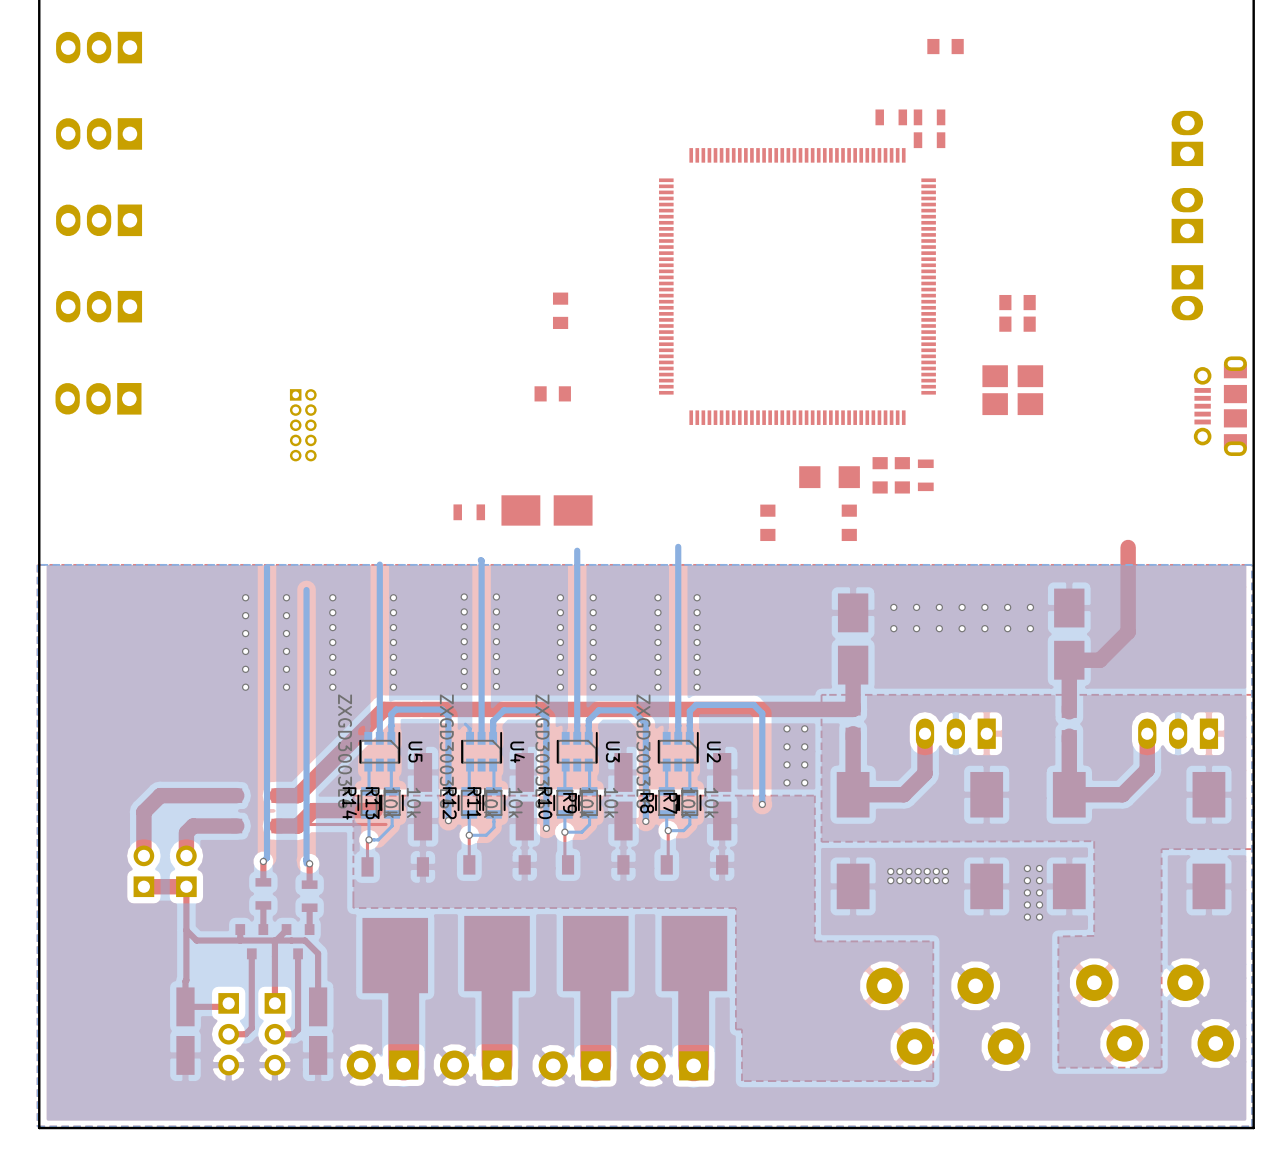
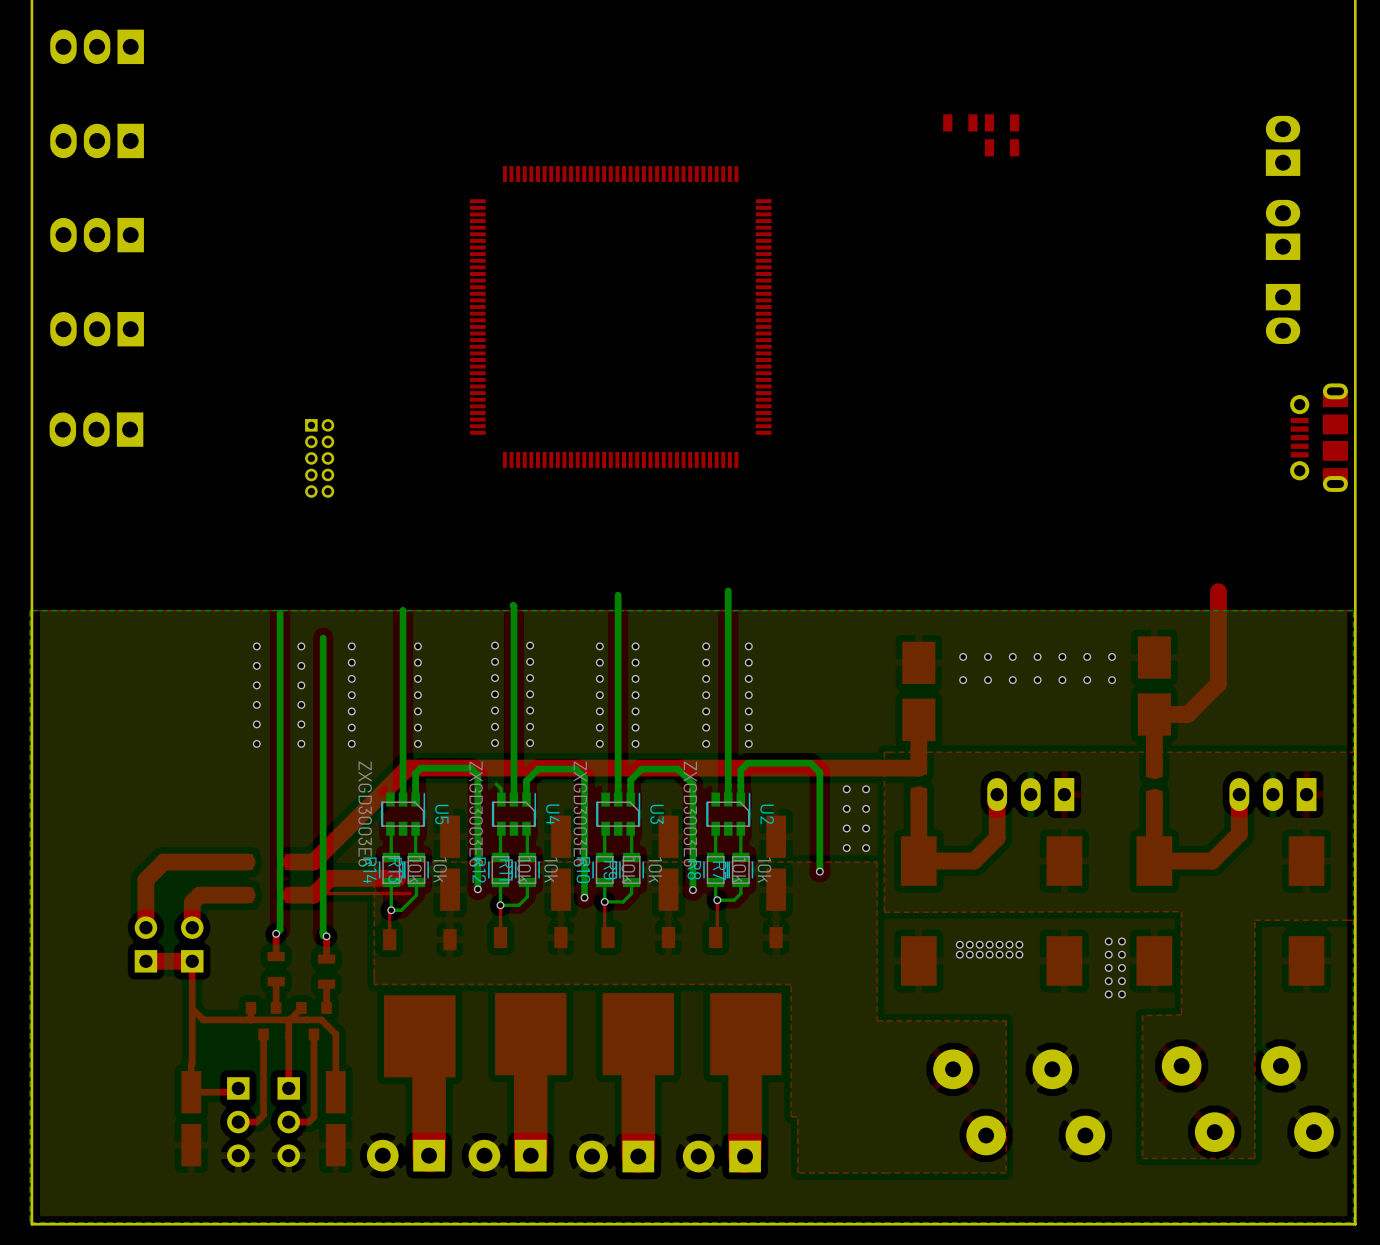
part: (945, 46) -> none
part position: (797, 286) -> (620, 316)
part: (1017, 302) -> none
part: (560, 310) -> none
part: (1017, 324) -> none
part: (1012, 390) -> none
part: (552, 393) -> none
part: (880, 475) -> none
part: (902, 475) -> none
part: (925, 475) -> none
part: (829, 477) -> none
part: (547, 510) -> none
part: (469, 512) -> none
part: (767, 522) -> none
part: (849, 522) -> none

